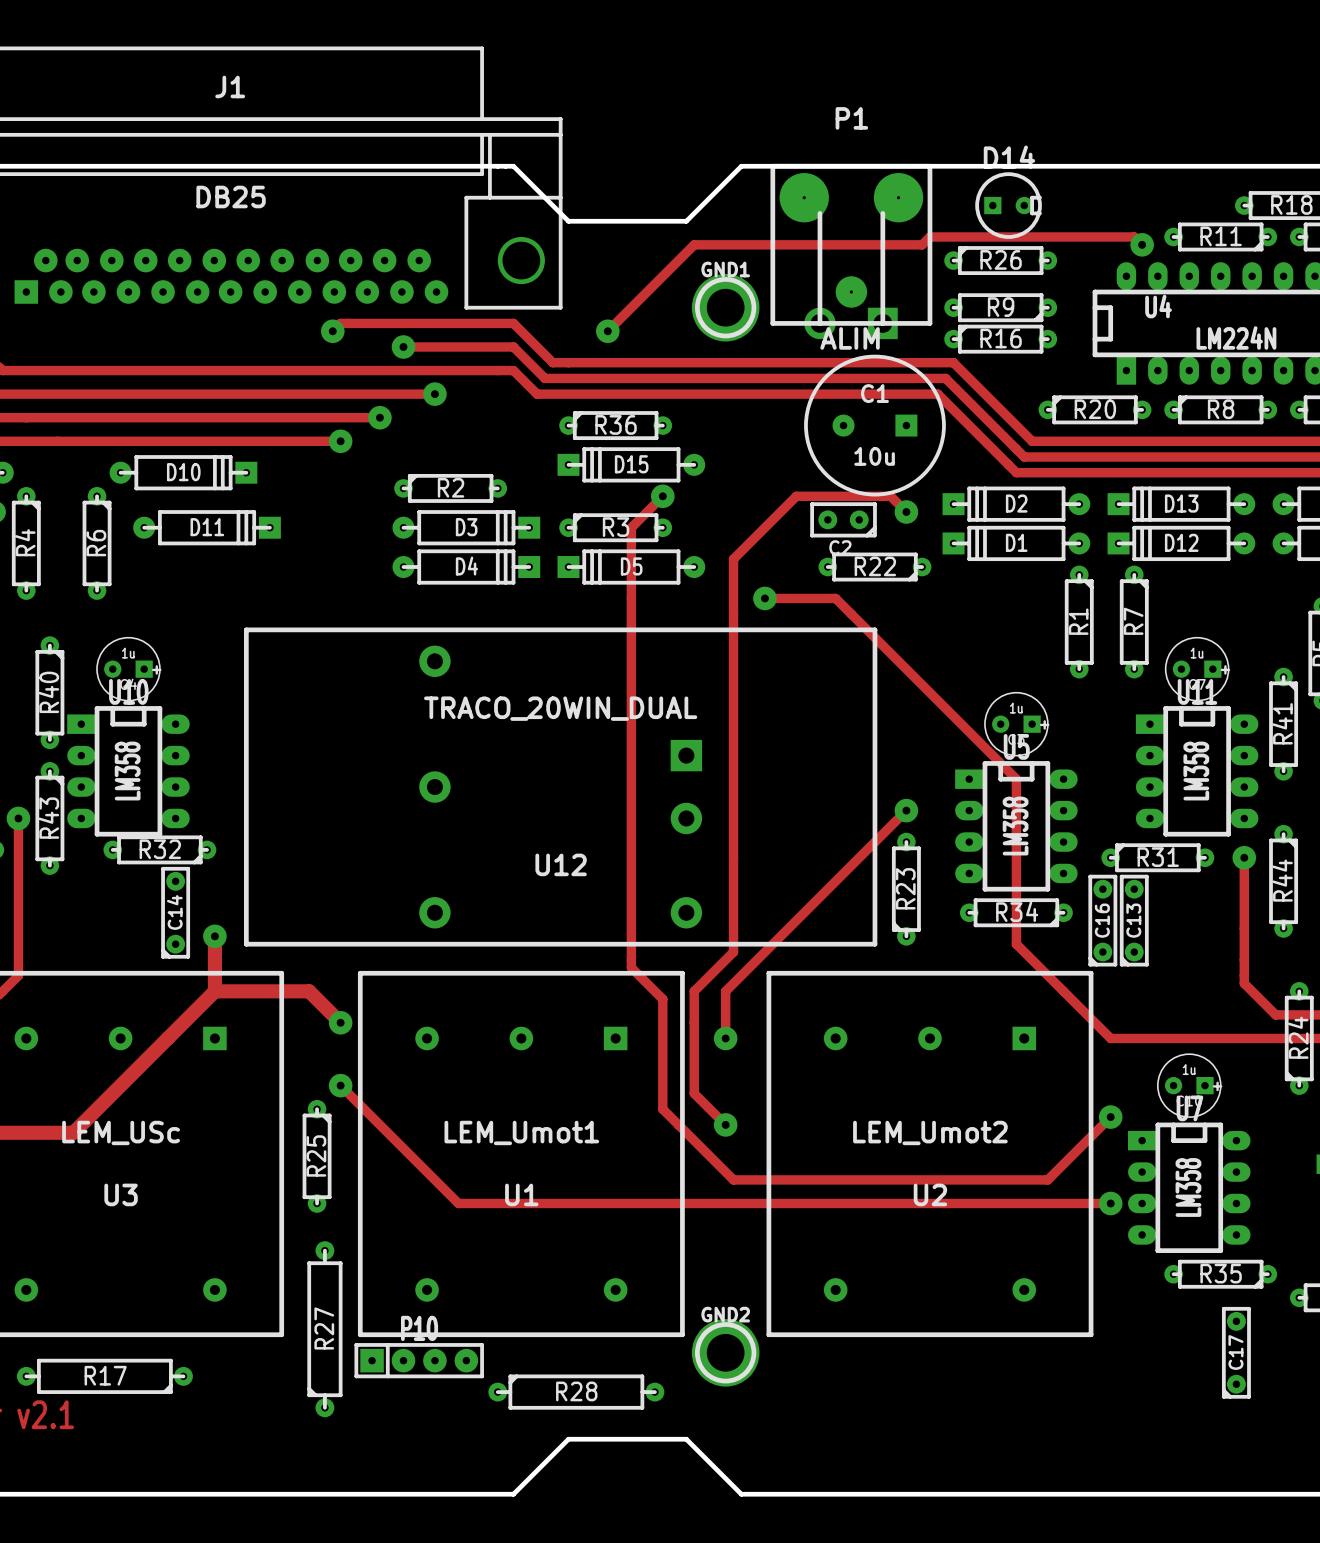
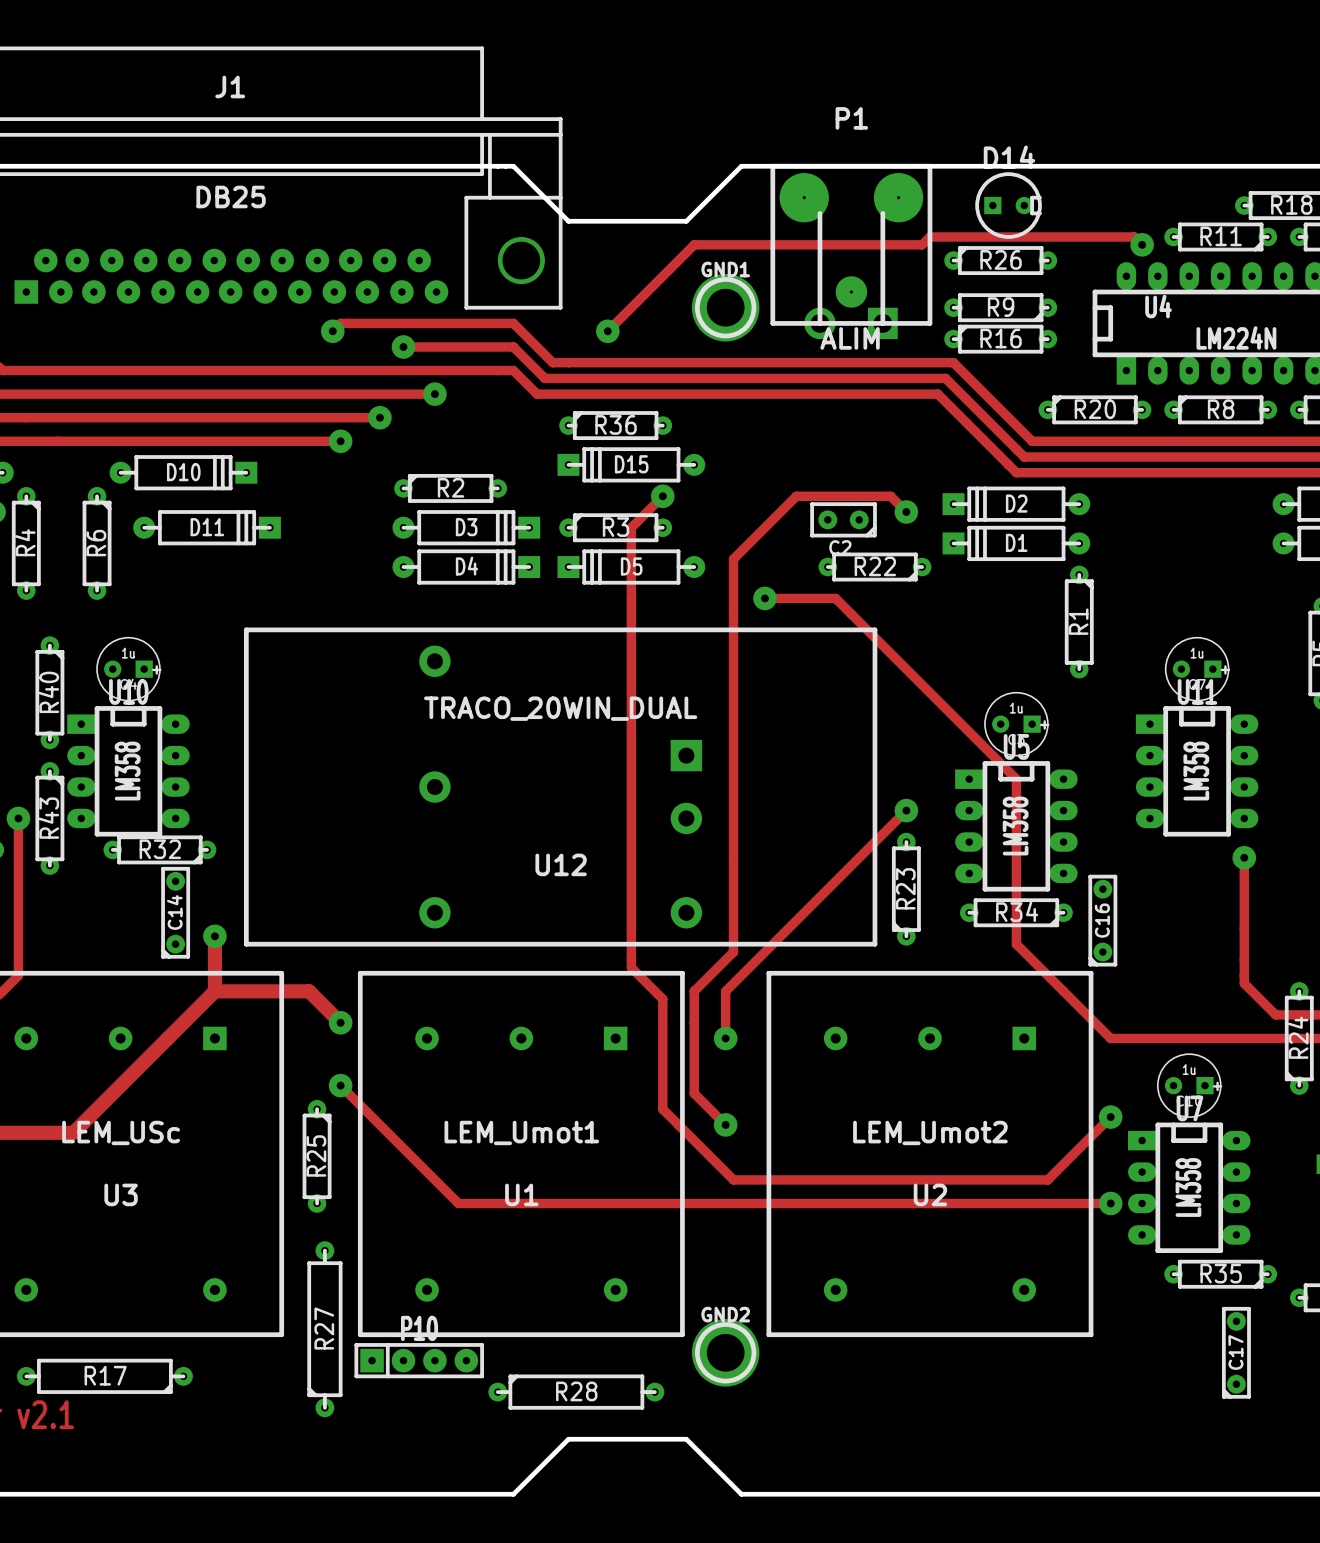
C1: 10u (874, 425) -> none
D13: (1181, 504) -> none
D12: (1181, 543) -> none
R7: (1134, 622) -> none
R41: (1283, 724) -> none
R31: (1157, 857) -> none
R44: (1283, 881) -> none
C13: (1134, 920) -> none

